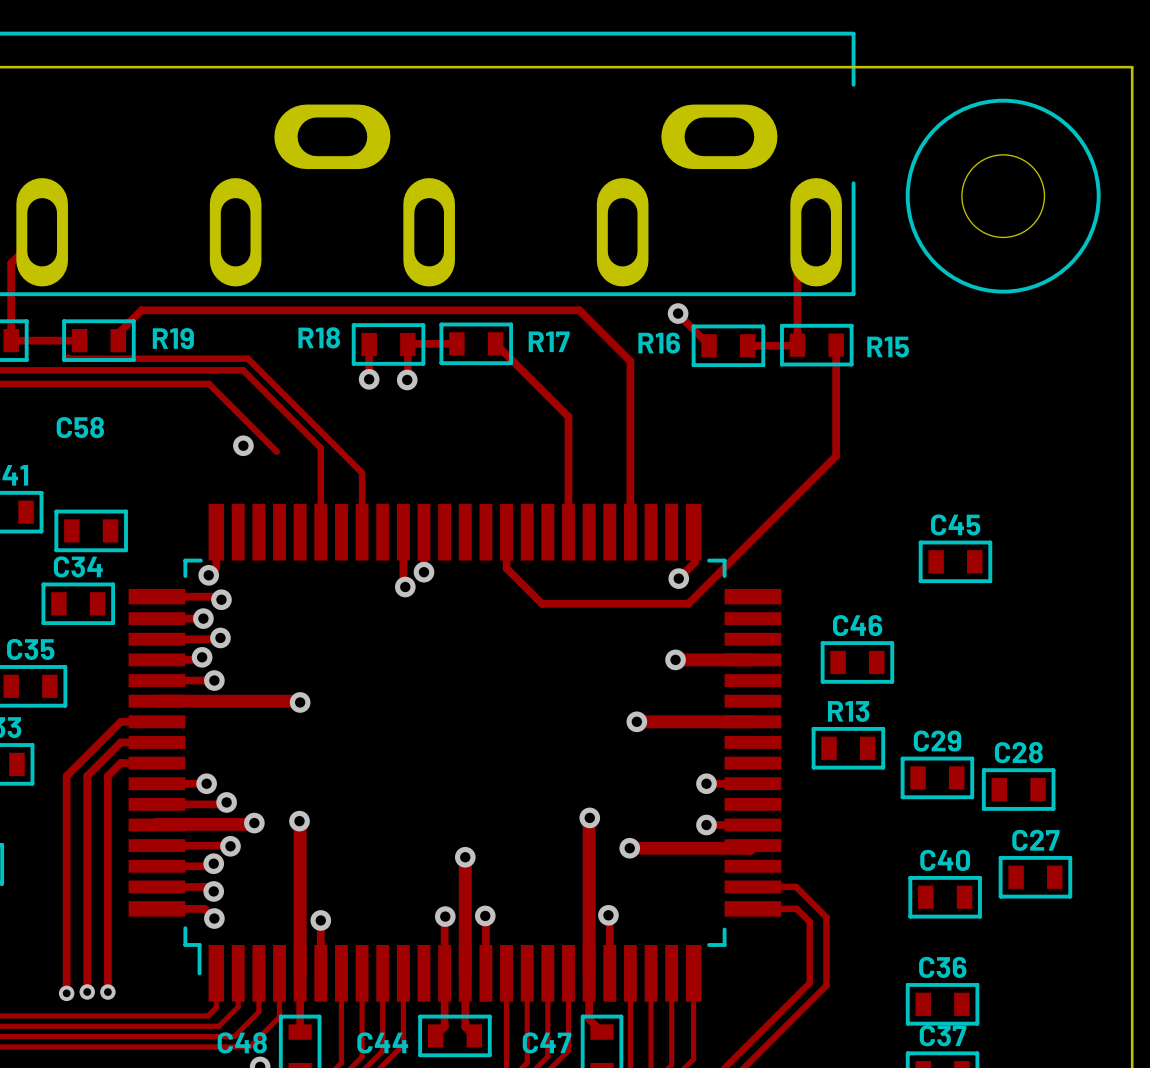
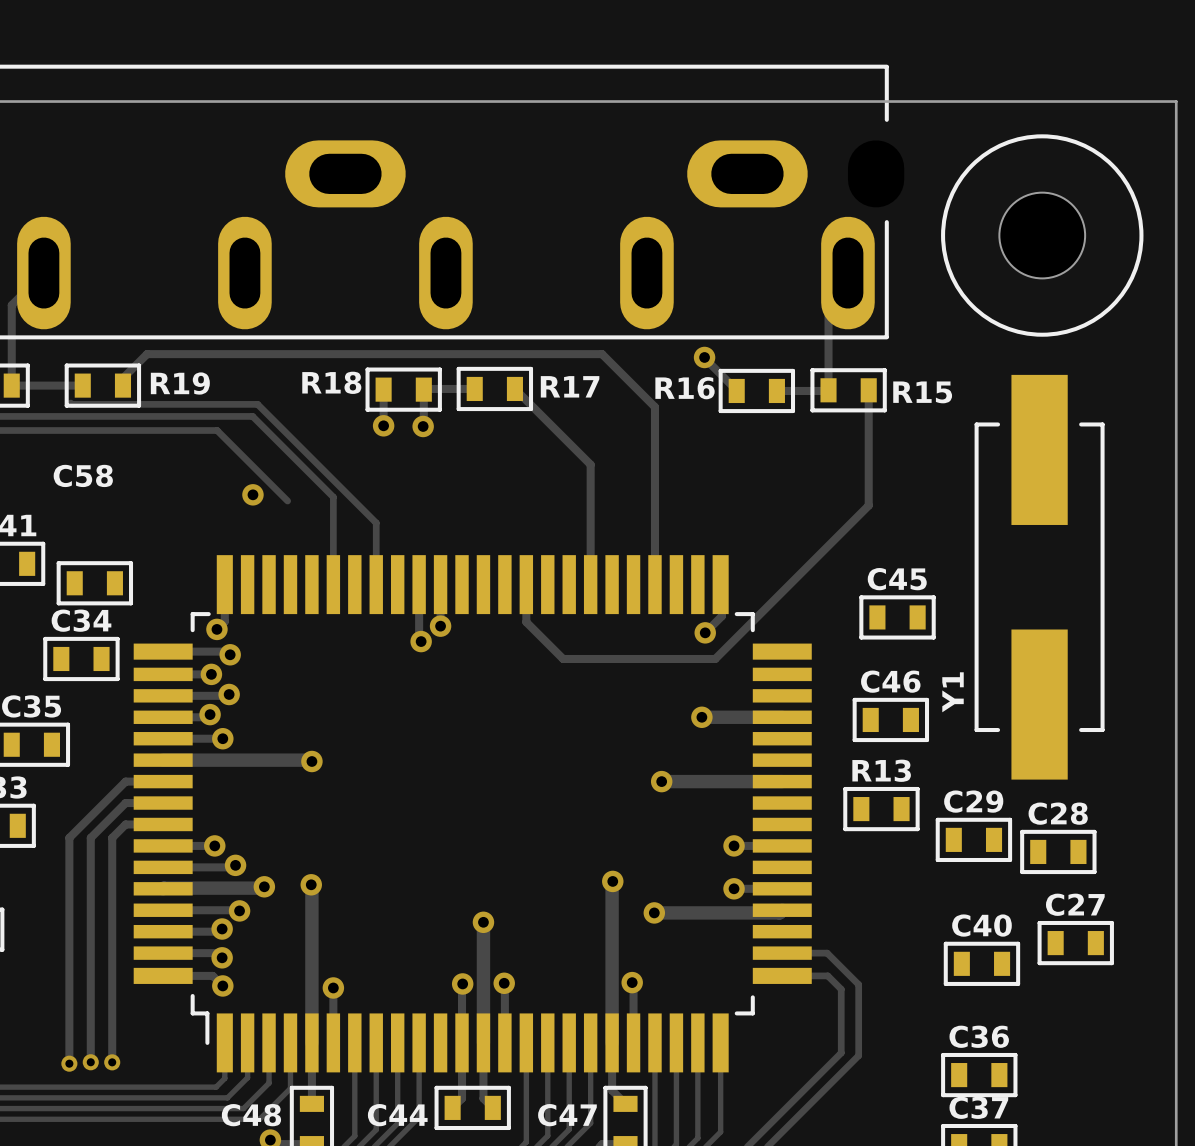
Y1: none -> (1039, 577)
C45 position: (955, 561) -> (897, 617)

